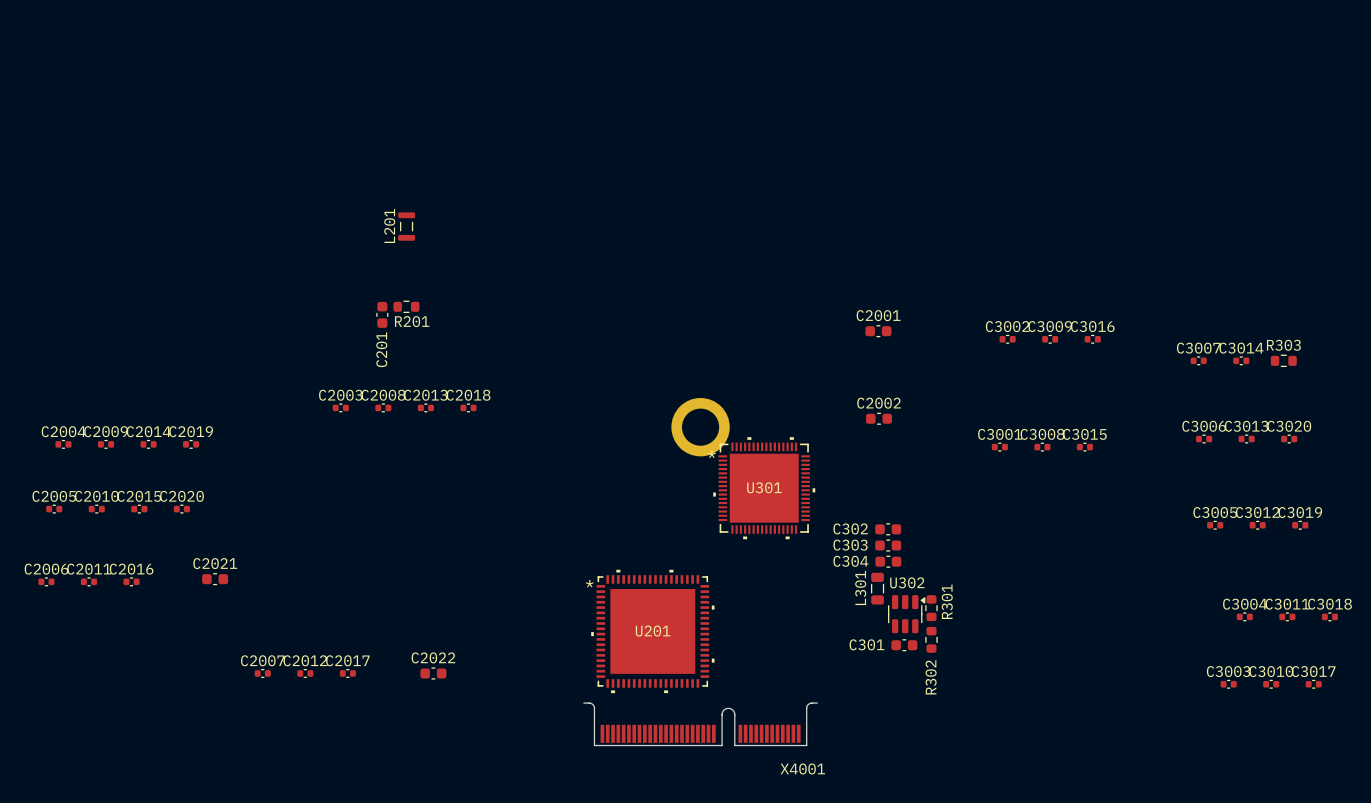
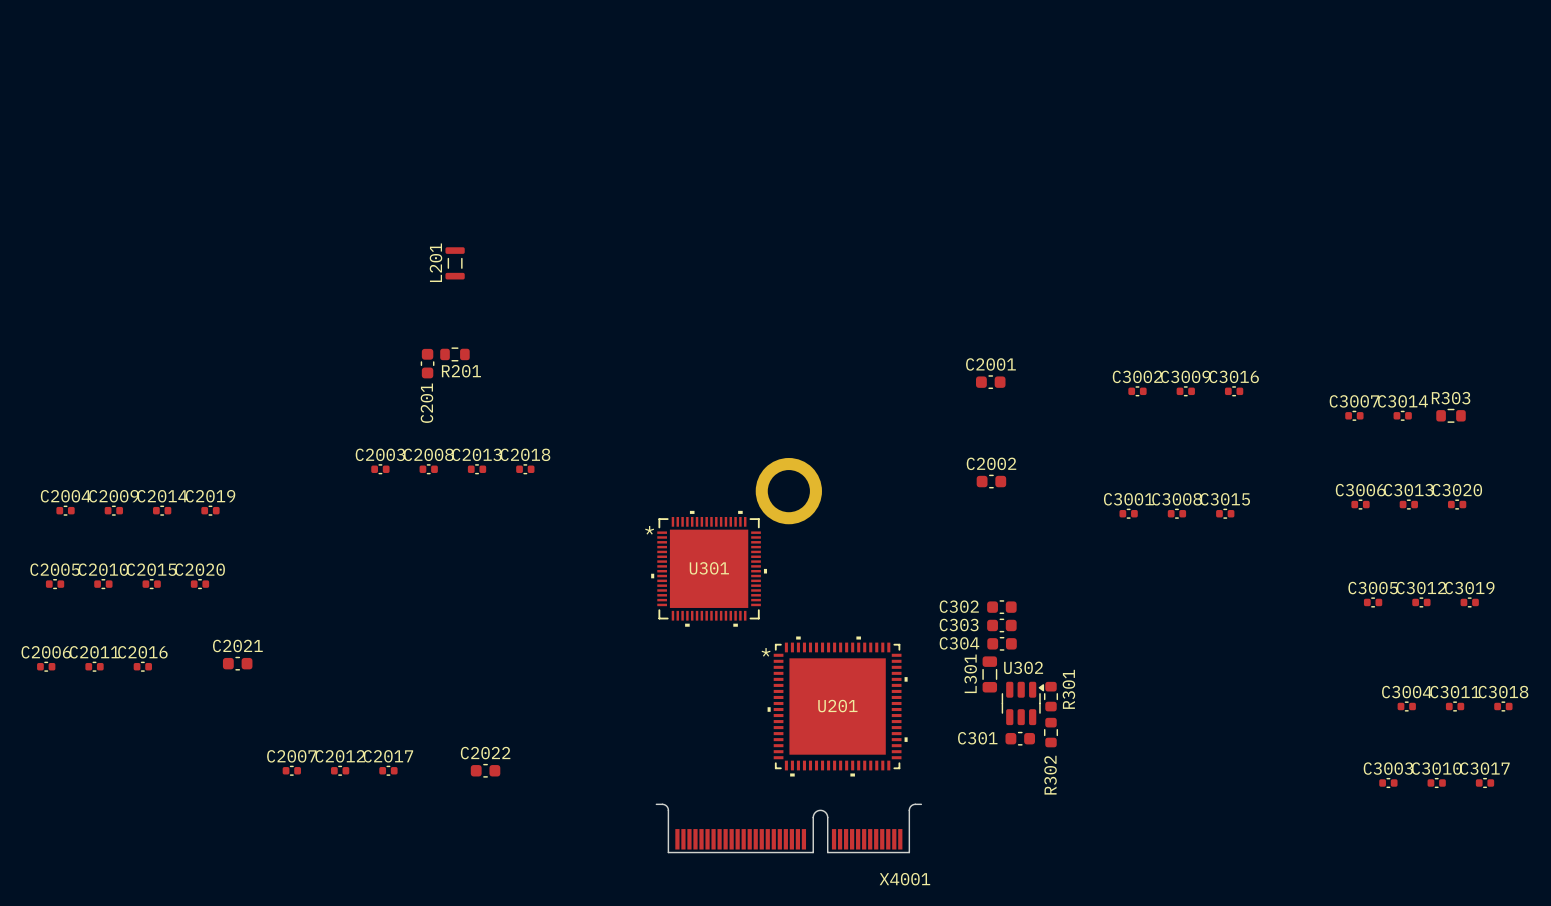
U301 position: (764, 488) -> (709, 568)
U201 position: (652, 631) -> (837, 706)

